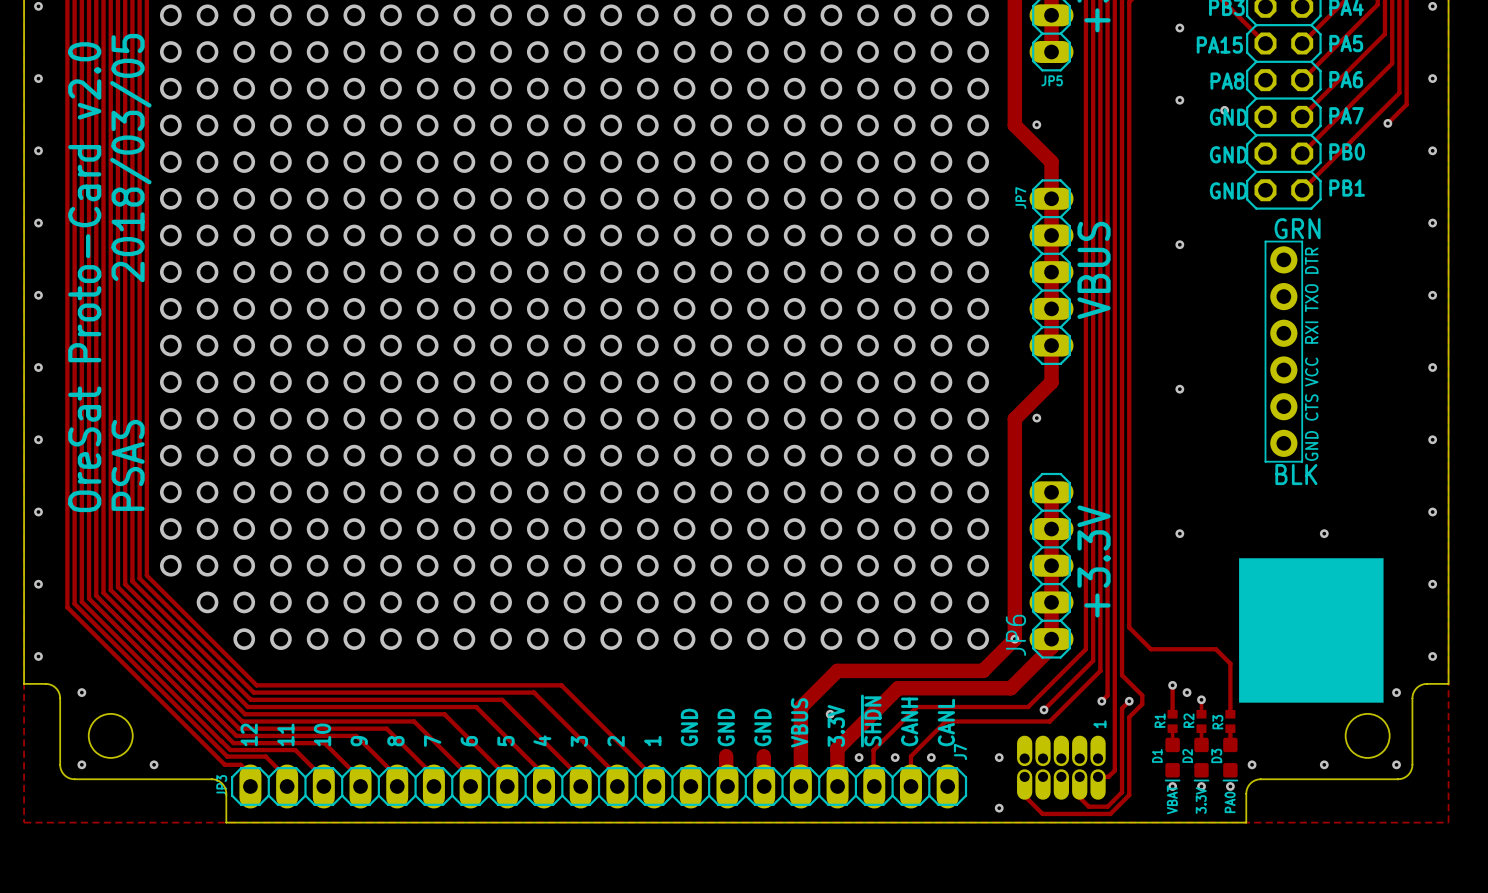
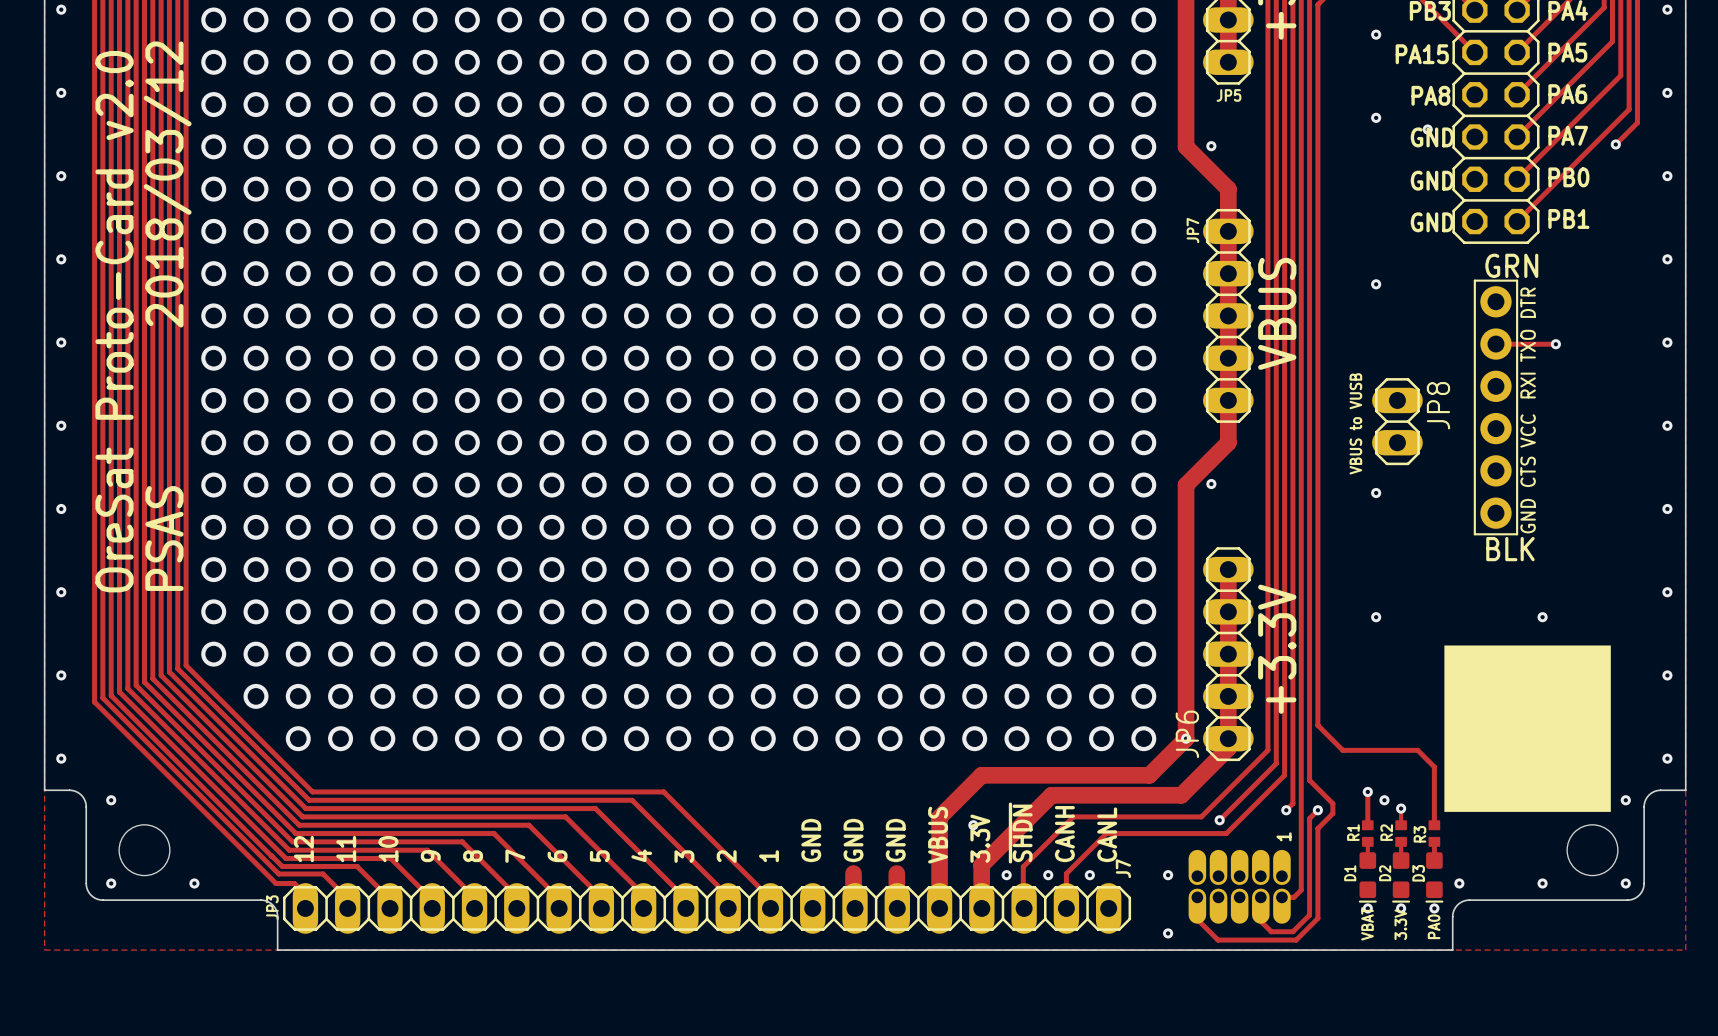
text: 2018/03/05 (130, 158) -> 2018/03/12 (167, 184)
track: none -> (1496, 344) (1555, 344)
via: none -> (1555, 344)
JP8: none -> (1397, 421)
text: none -> VBUS to VUSB (1355, 423)
via position: (1179, 389) -> (1376, 493)

